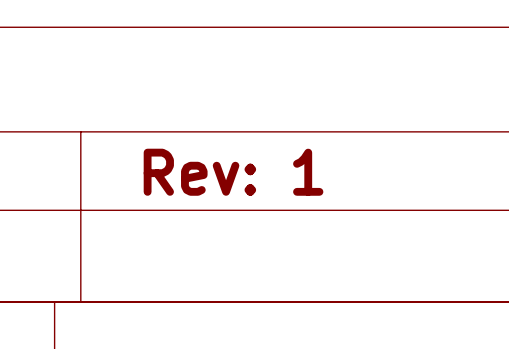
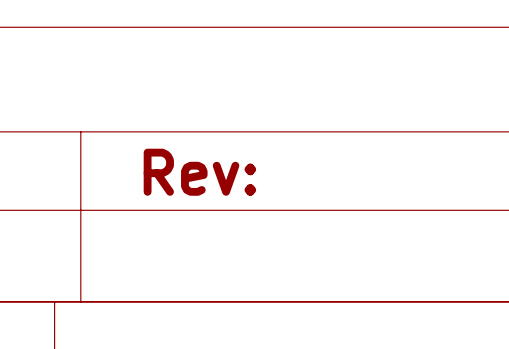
title block: Rev: 1 (233, 172) -> Rev: (199, 172)

